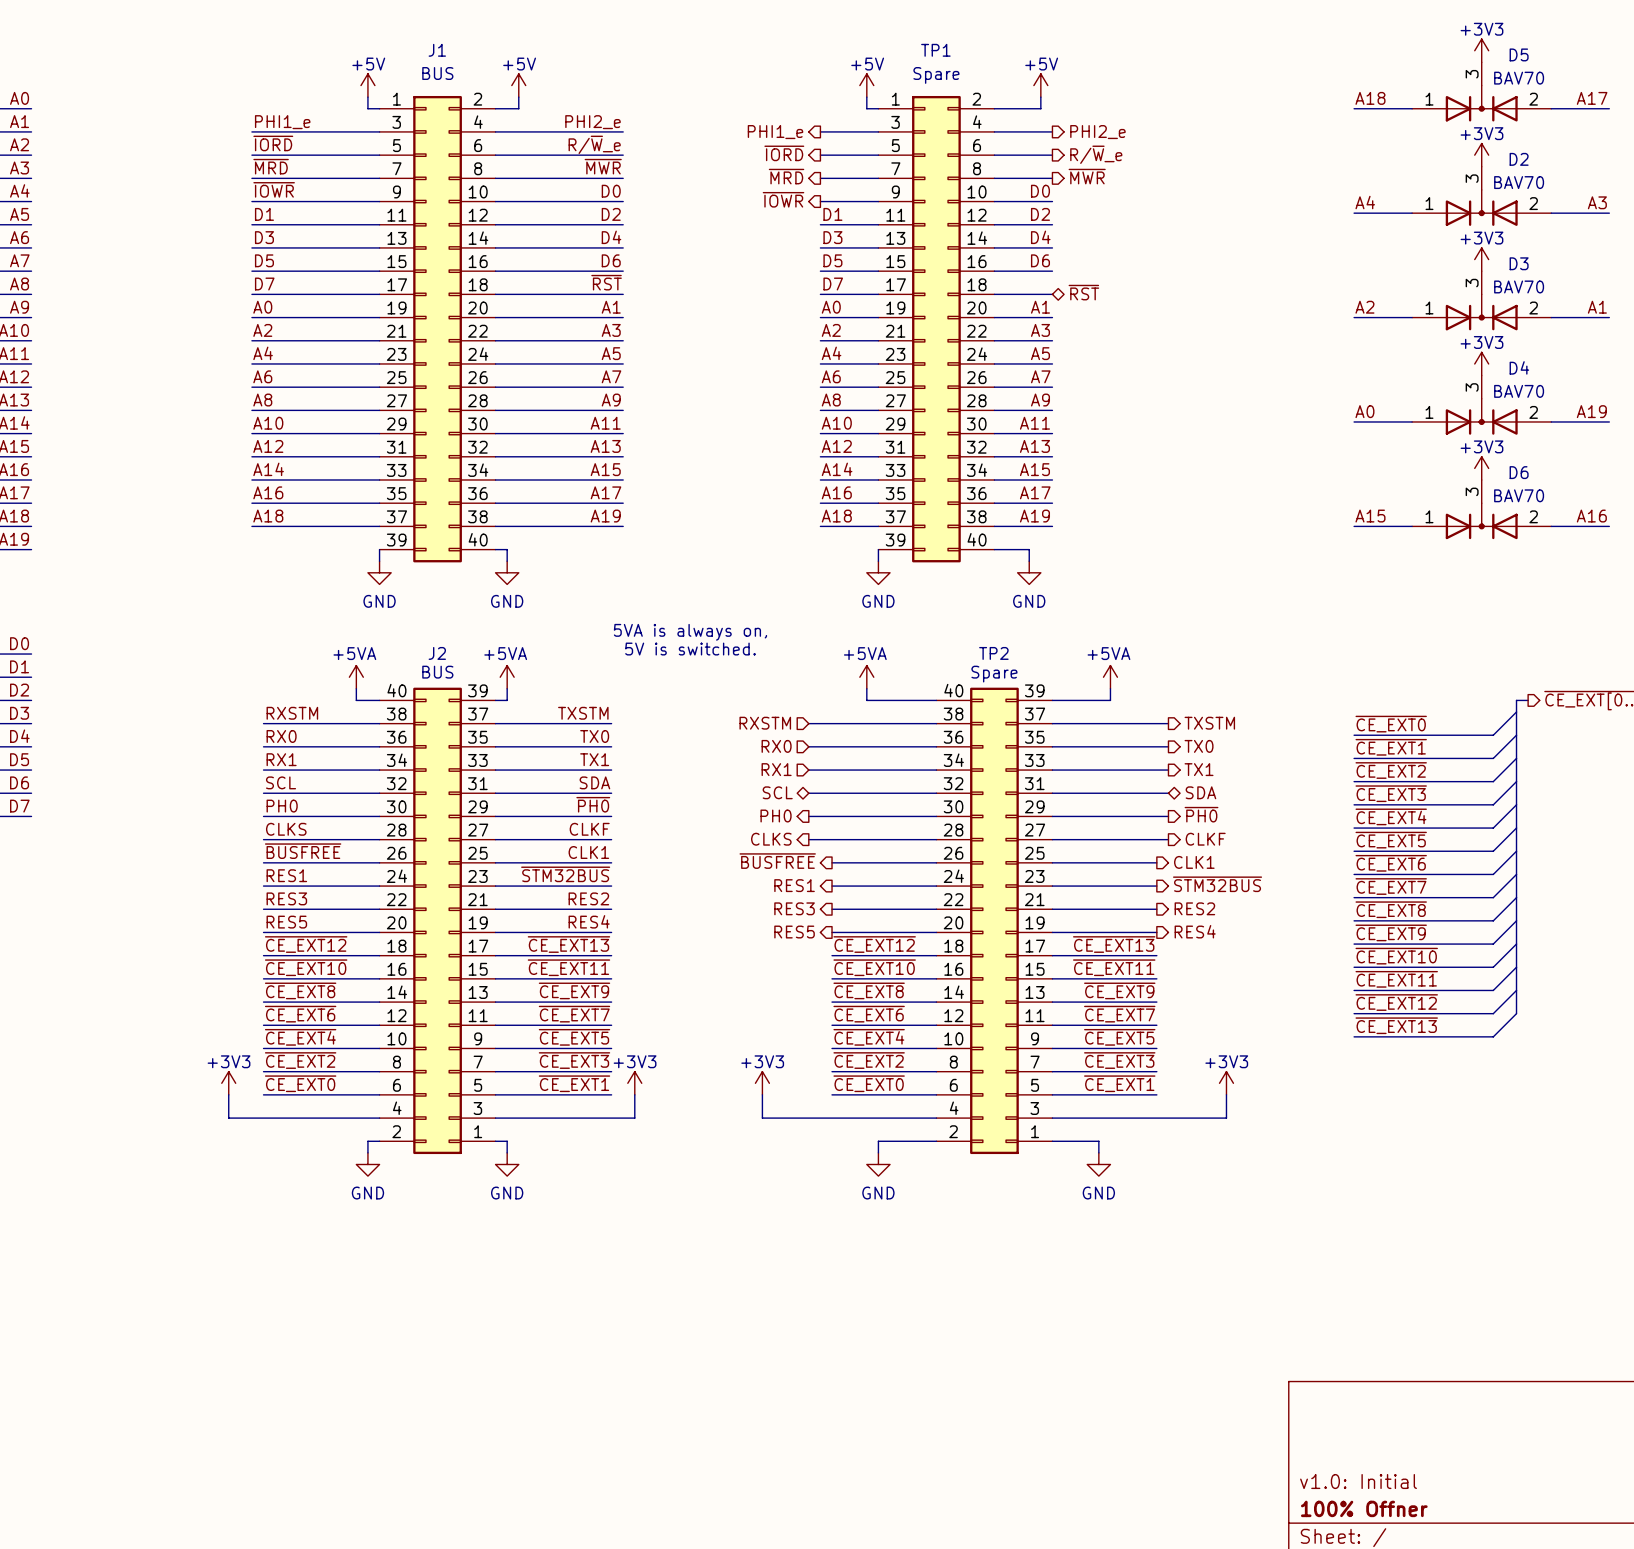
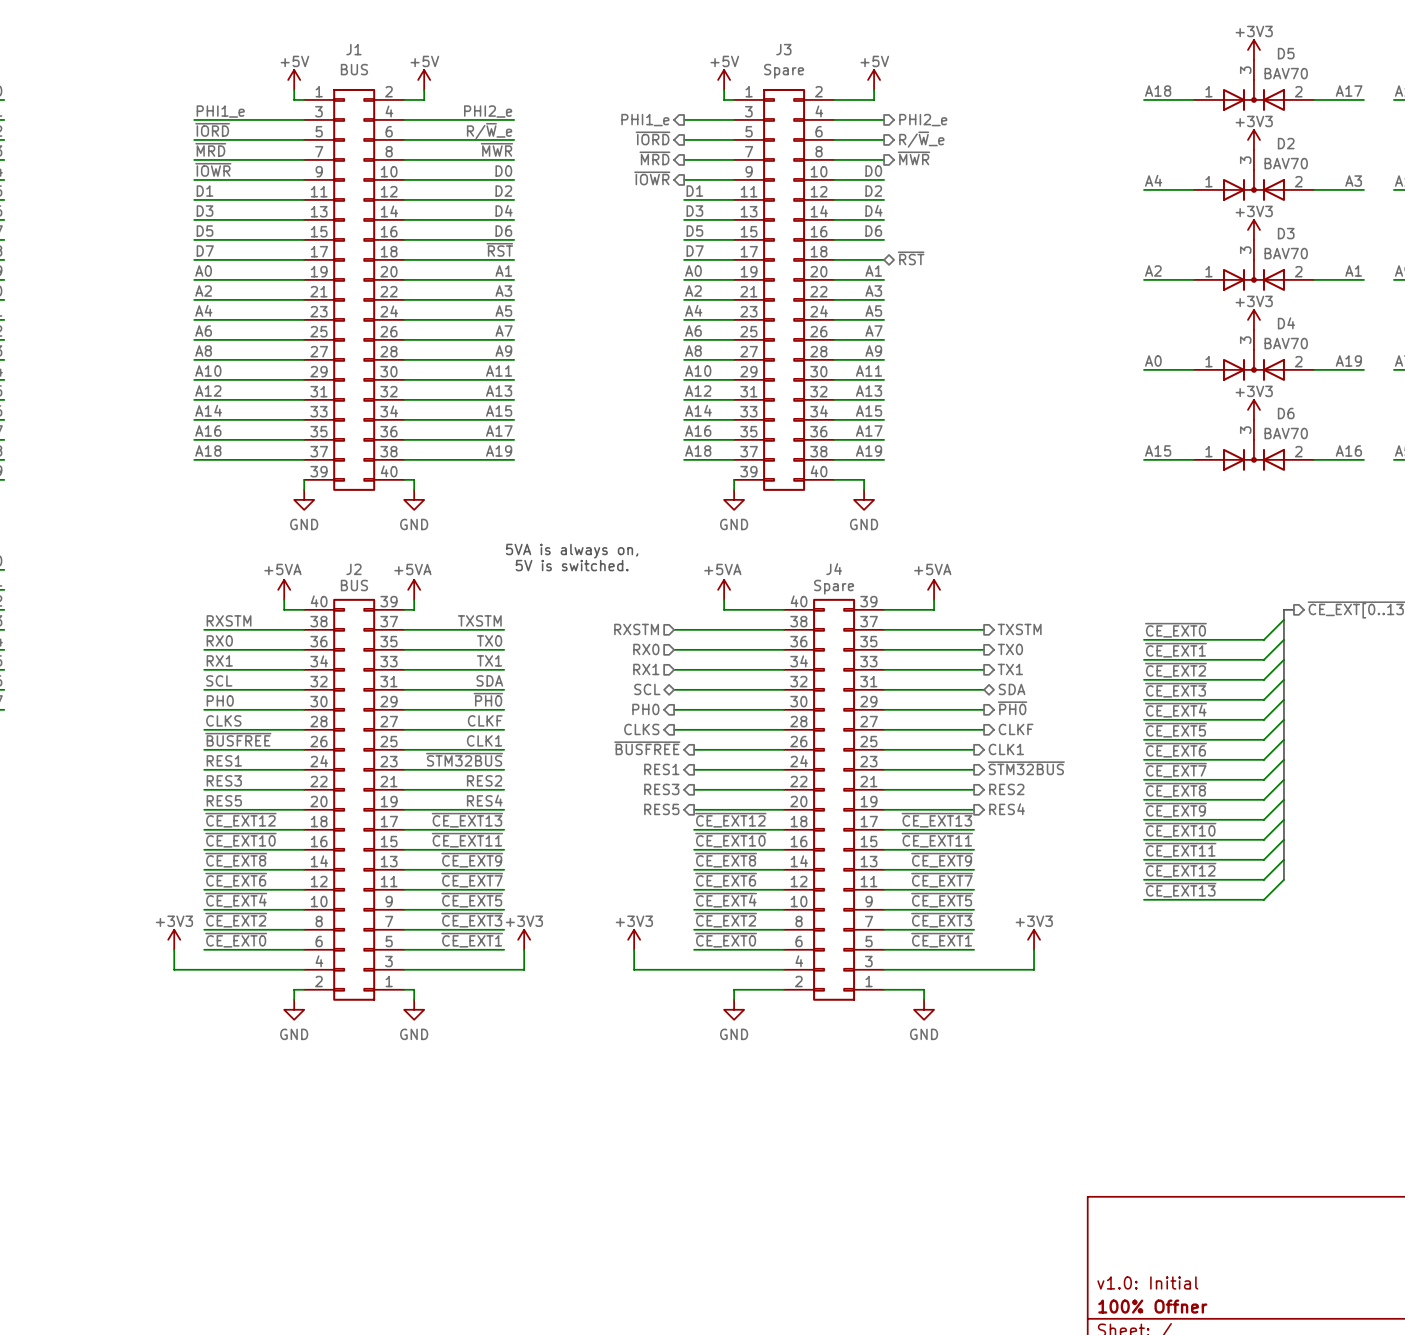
TP1 name: TP1 (935, 50) -> J3 (783, 49)
TP2 name: TP2 (993, 653) -> J4 (834, 569)

